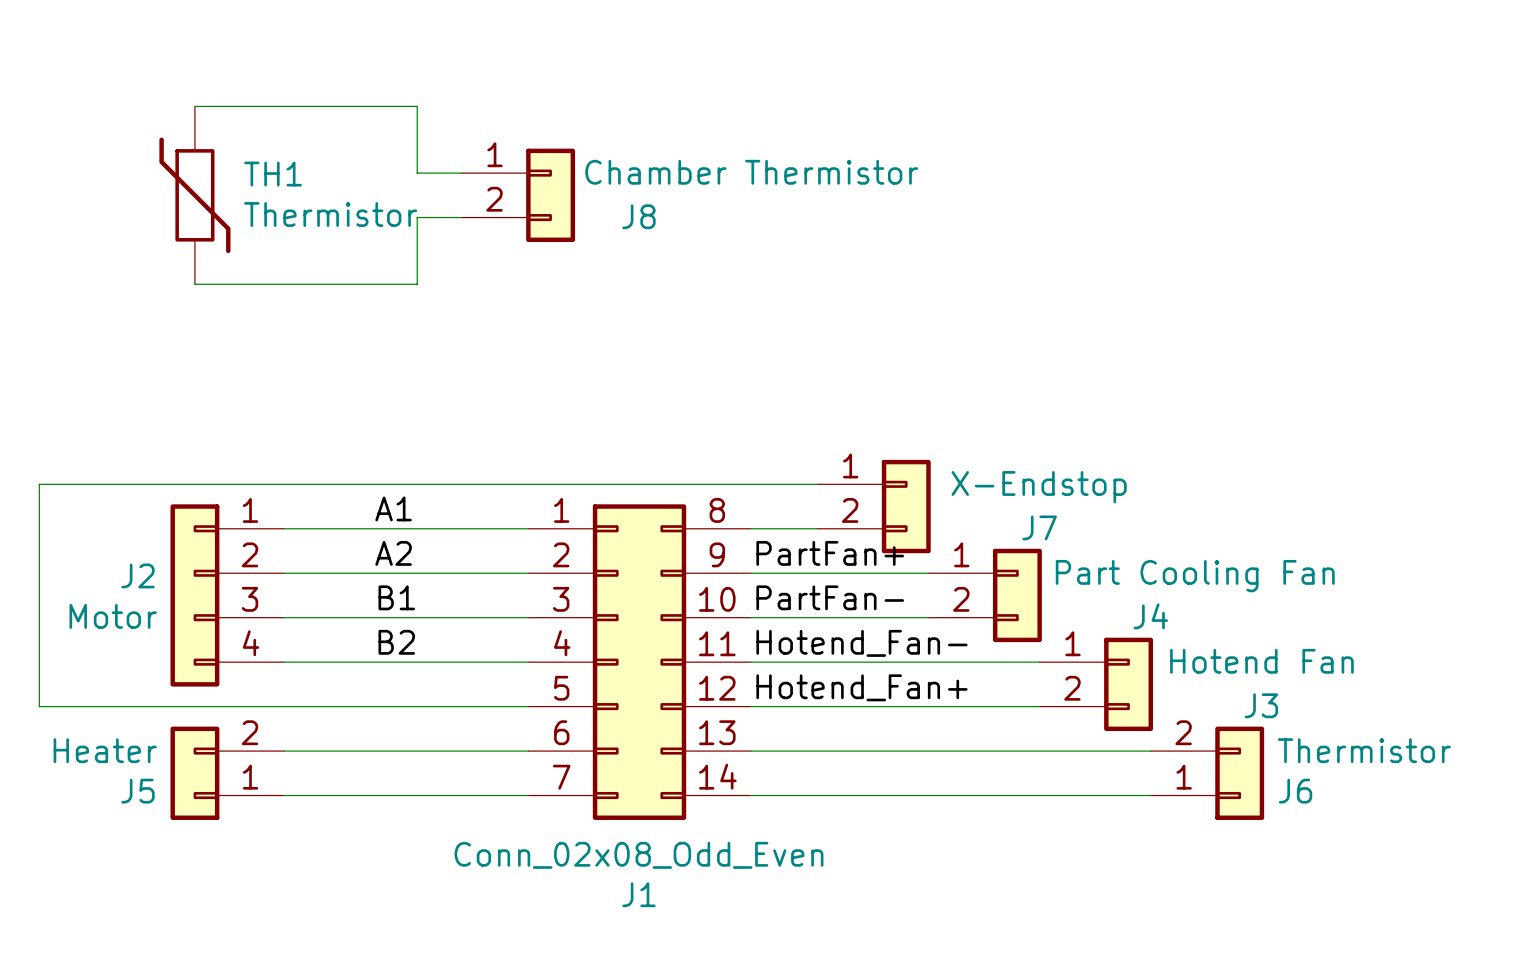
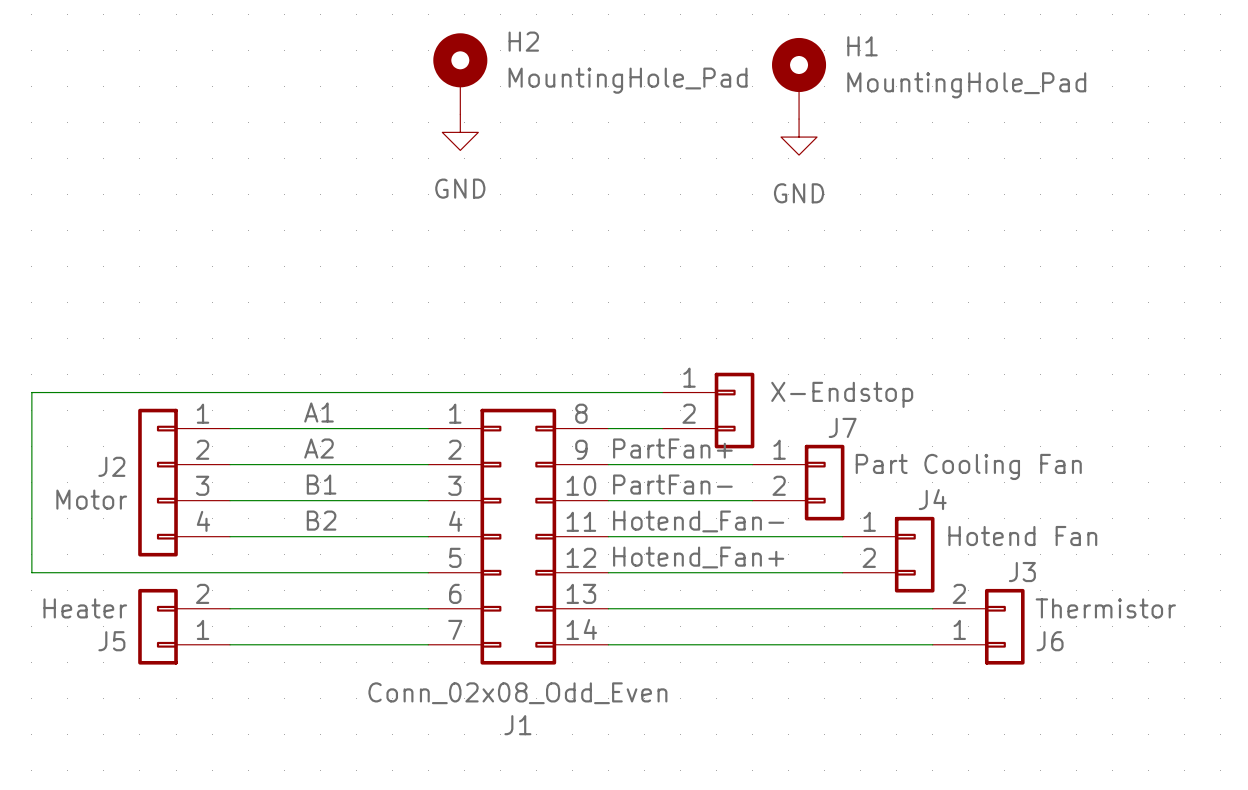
H2: none -> MountingHole_Pad (460, 73)
H1: none -> MountingHole_Pad (799, 78)
wire: (194, 106) (417, 106) (417, 173) (461, 173) -> none
power symbol: none -> GND (460, 132)
power symbol: none -> GND (799, 137)
TH1: Thermistor (194, 195) -> none
J8: Chamber Thermistor (518, 195) -> none
wire: (461, 217) (417, 217) (417, 284) (194, 284) -> none

